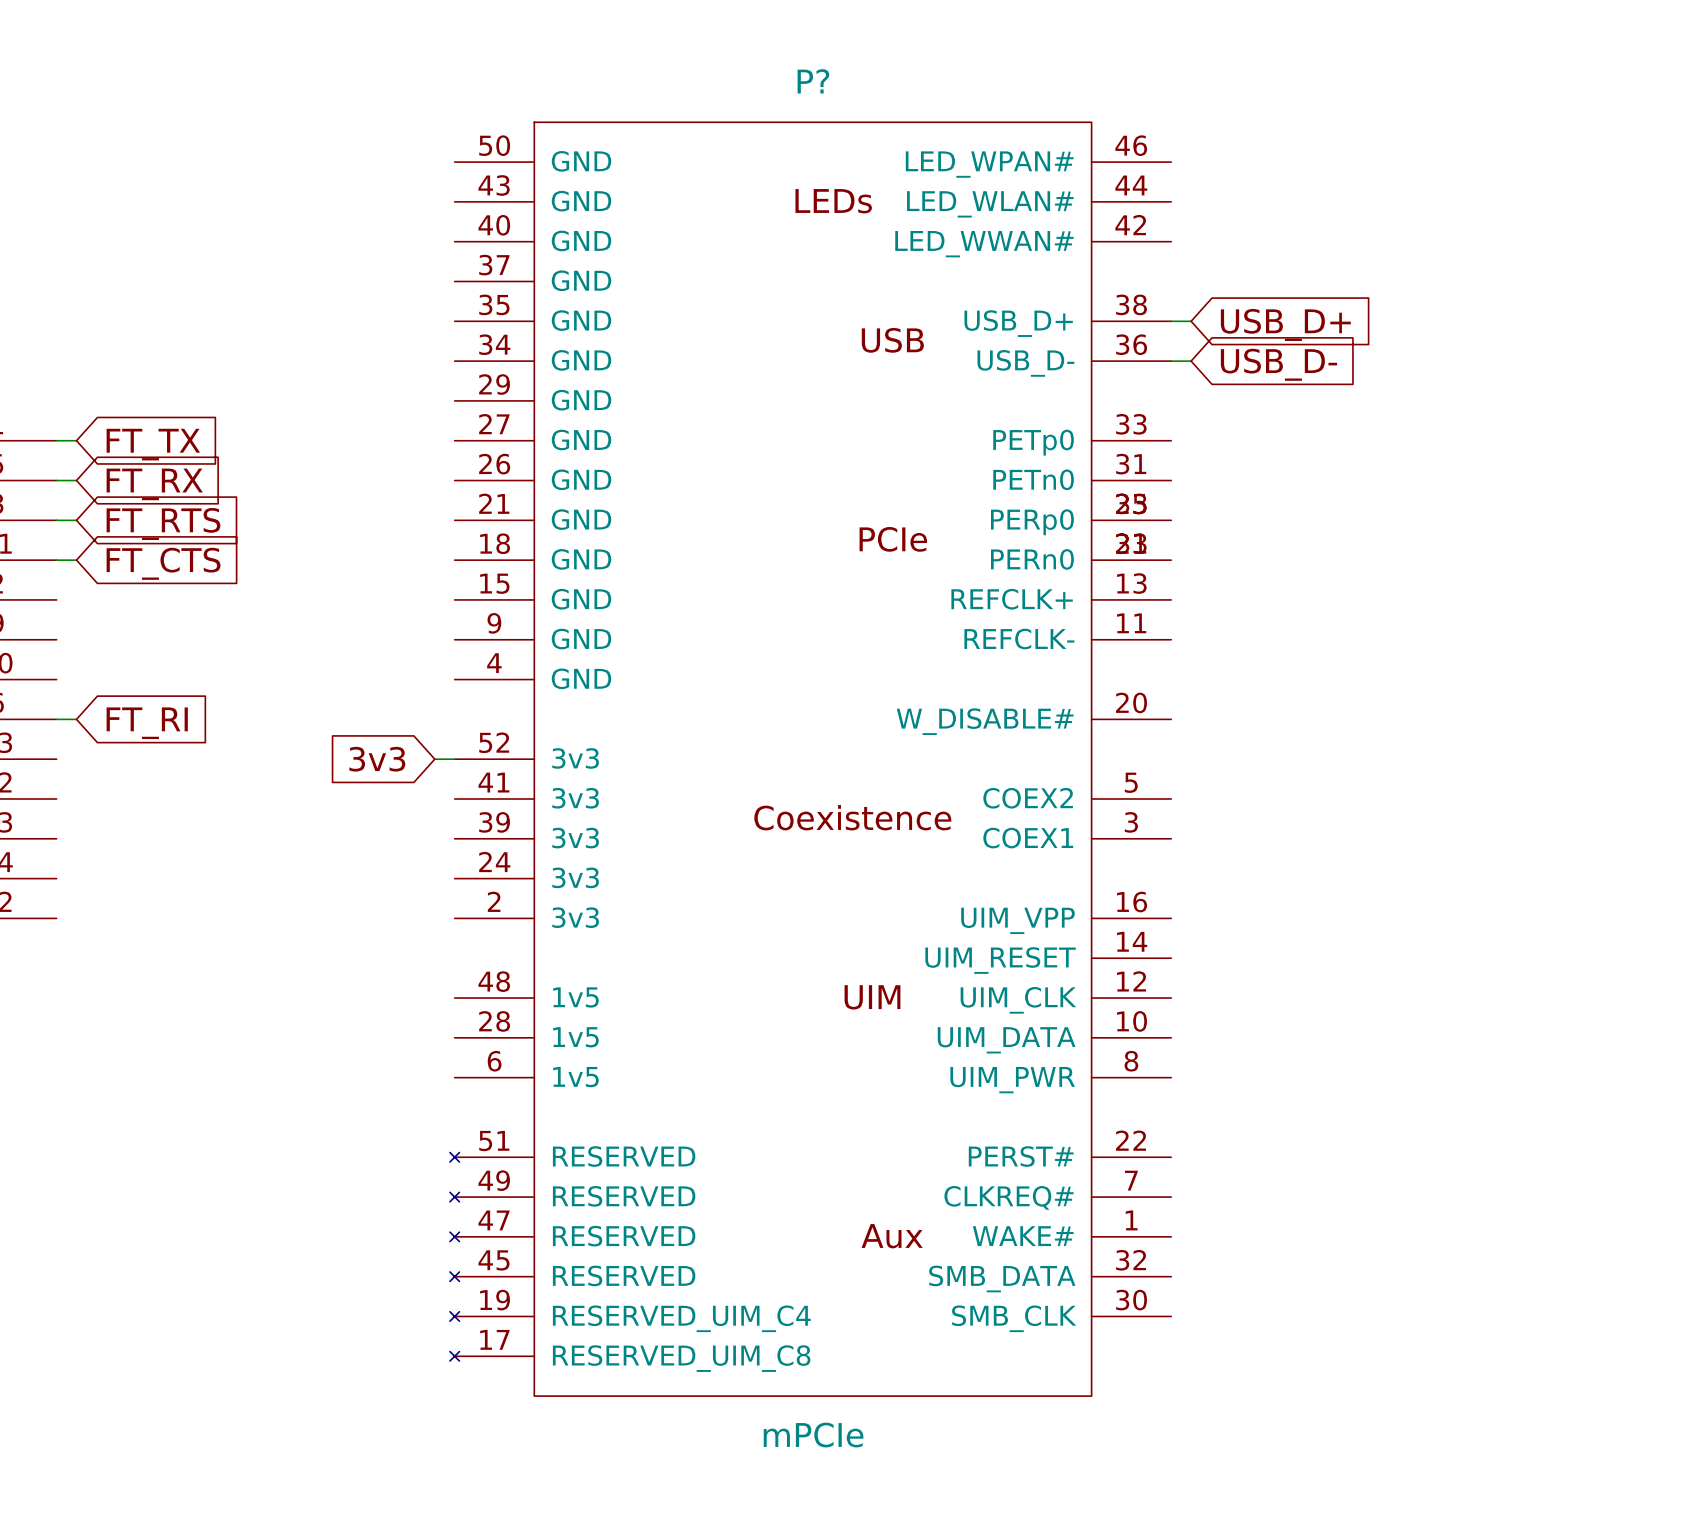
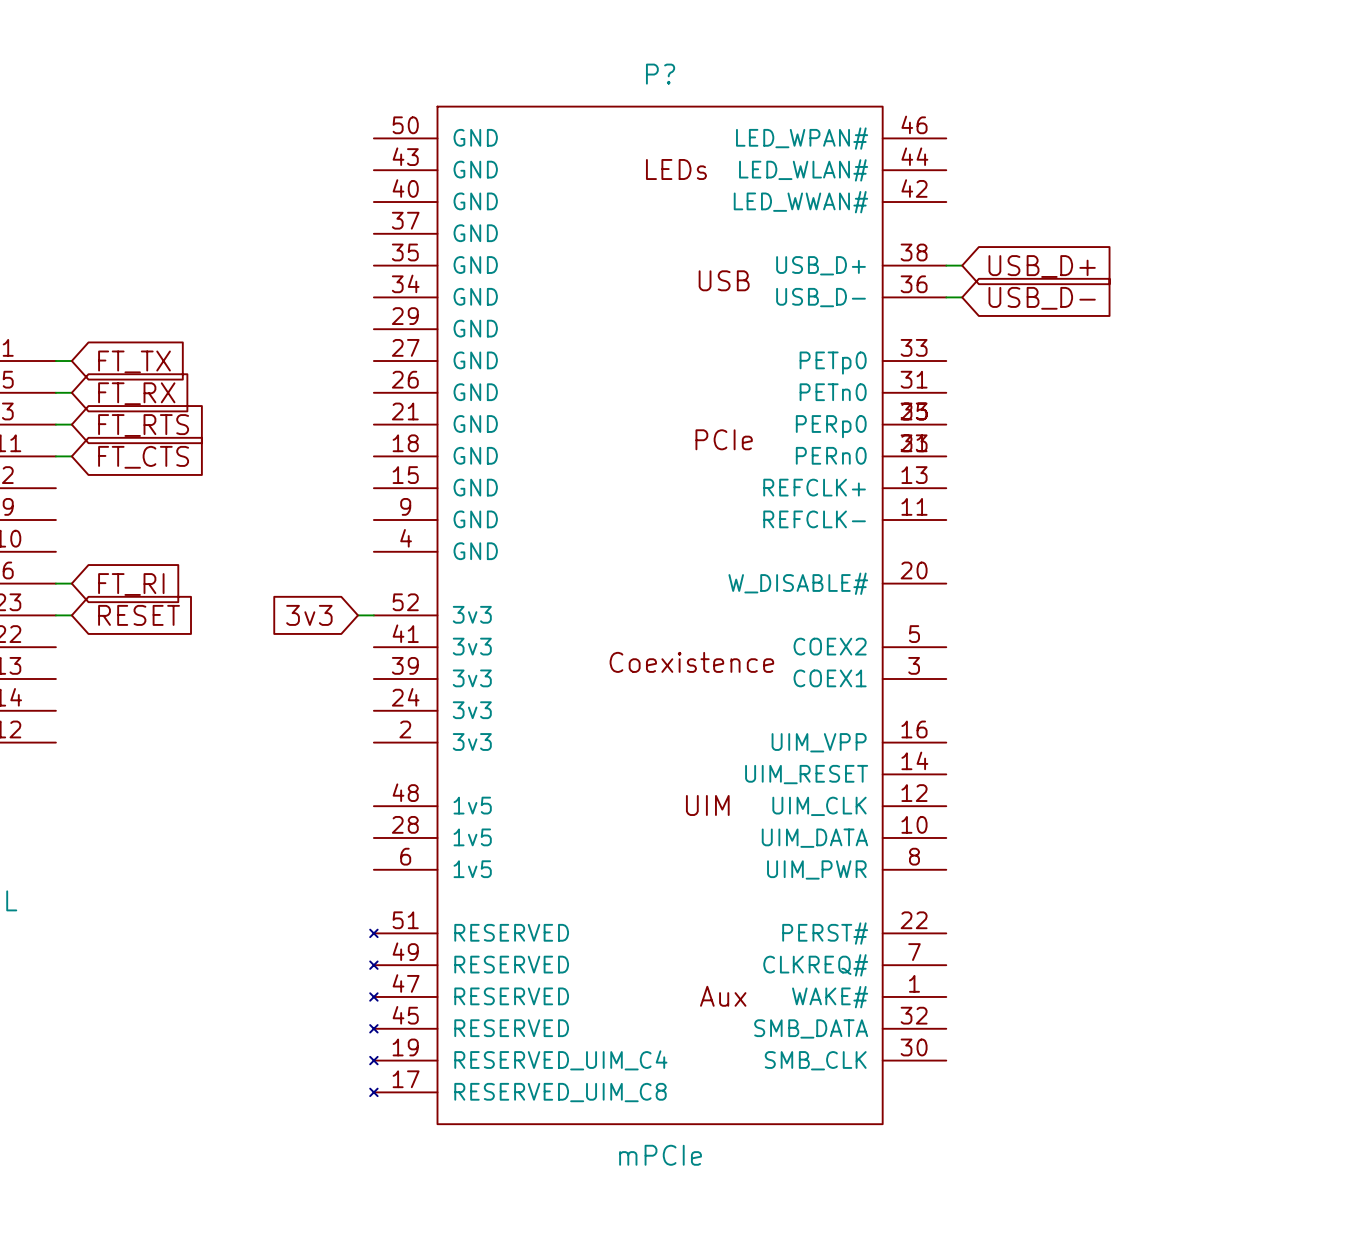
wire: none -> (55, 615) (71, 615)
global label: none -> RESET (139, 615)

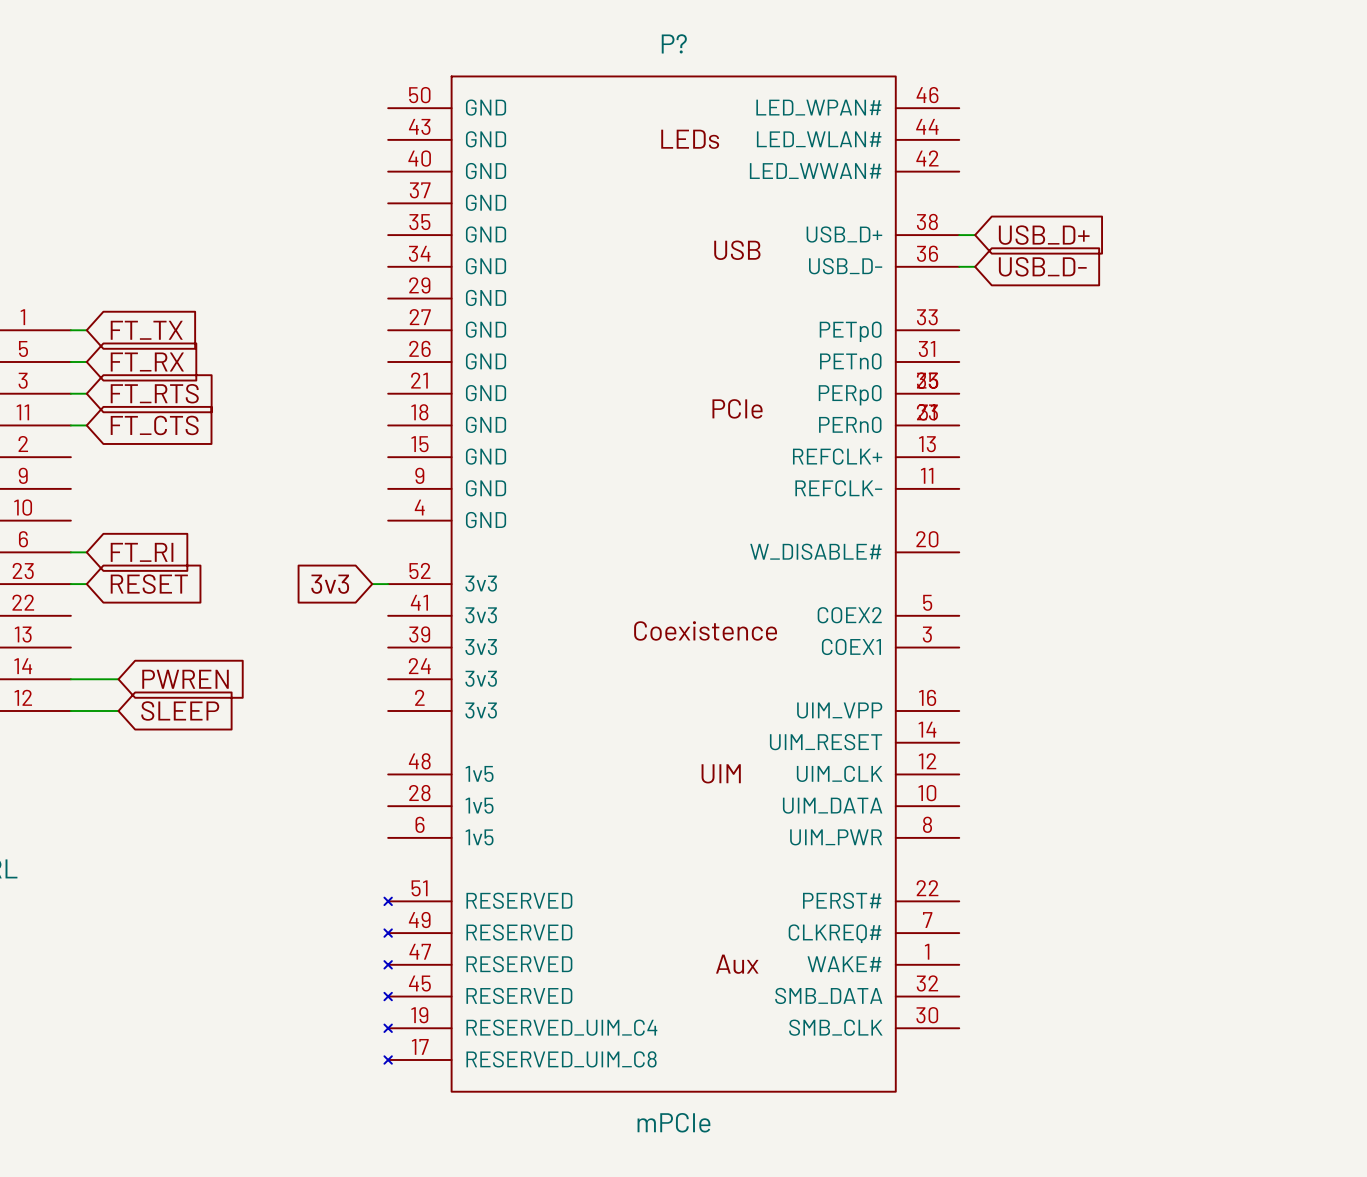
wire: none -> (70, 679) (118, 679)
global label: none -> PWREN (185, 679)
wire: none -> (70, 710) (118, 710)
global label: none -> SLEEP (180, 710)

